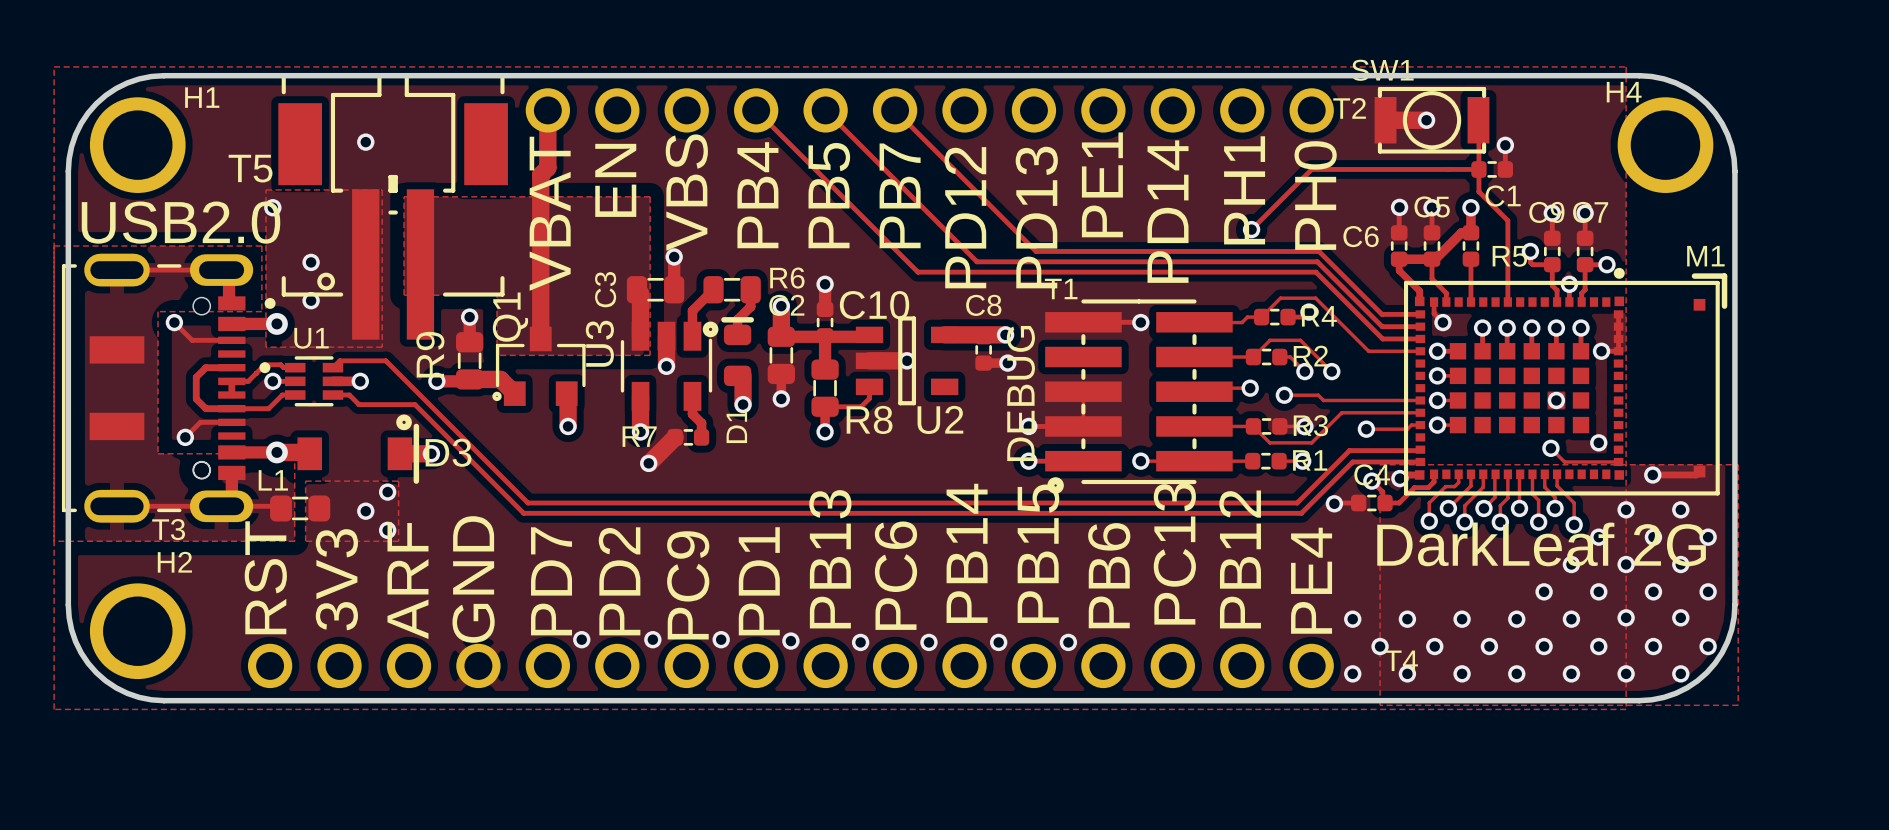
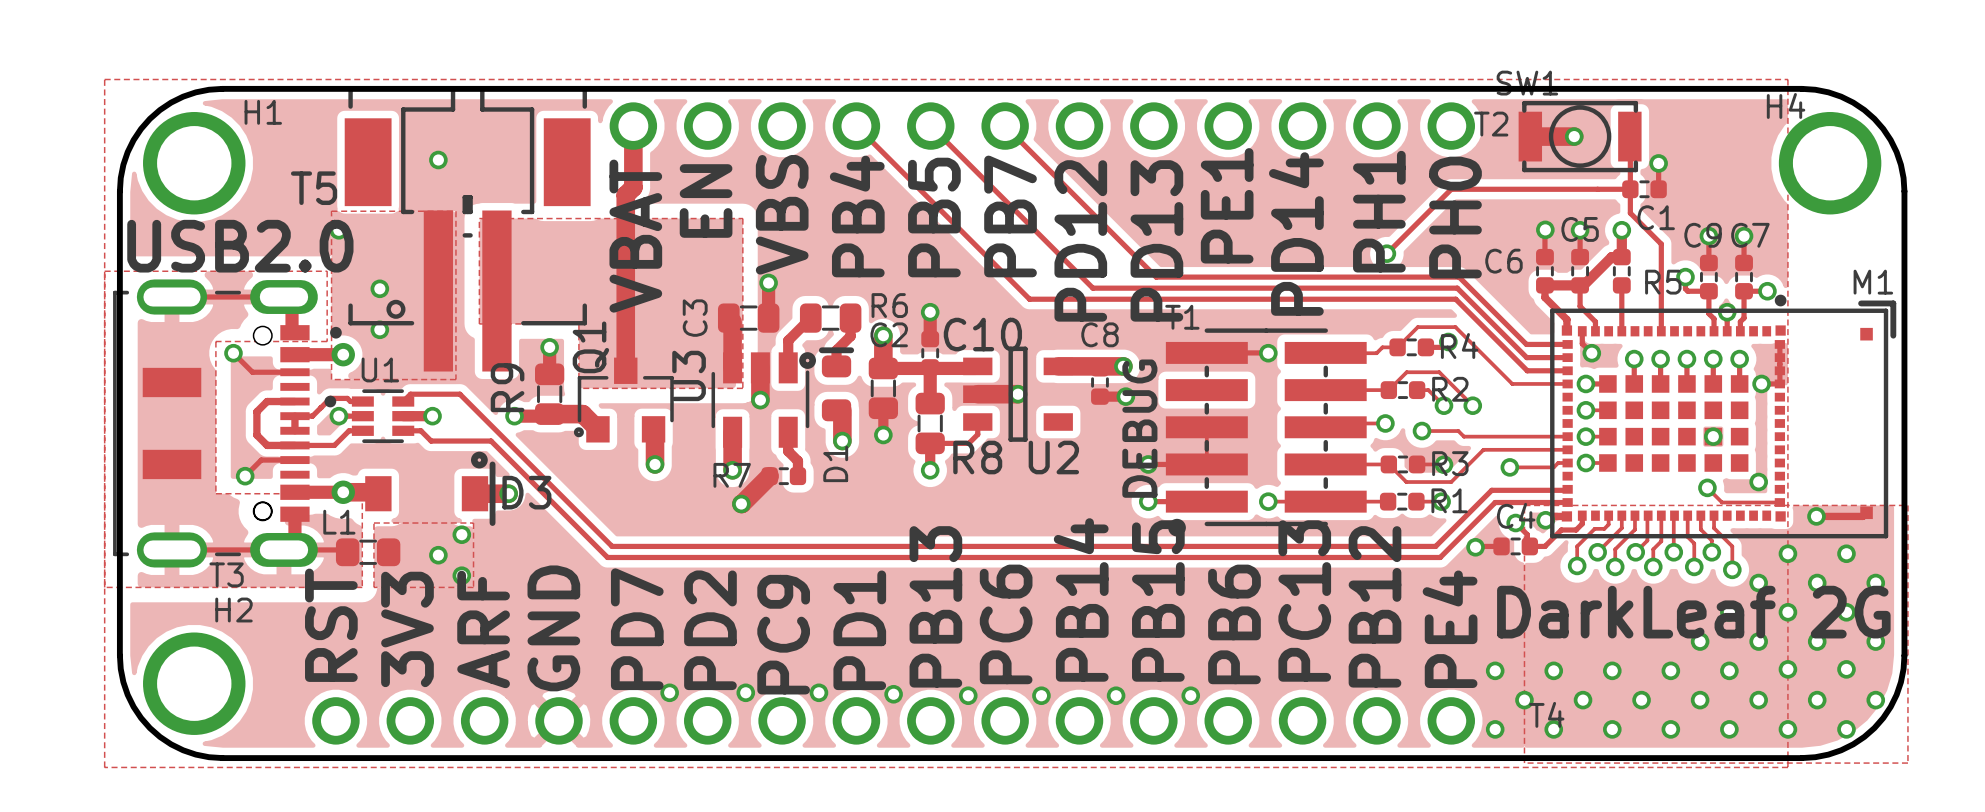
text position: DarkLeaf 2G (1541, 544) -> DarkLeaf 2G (1693, 612)

